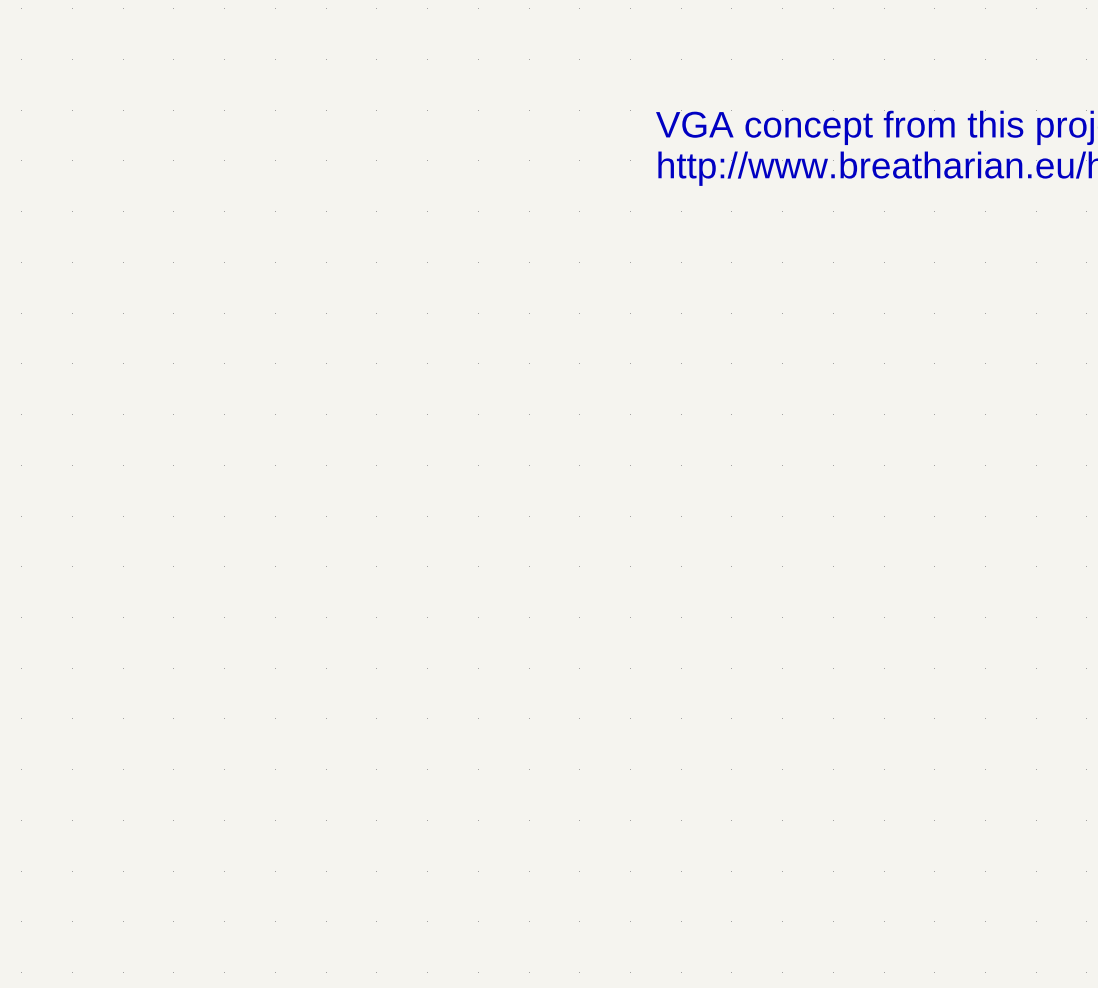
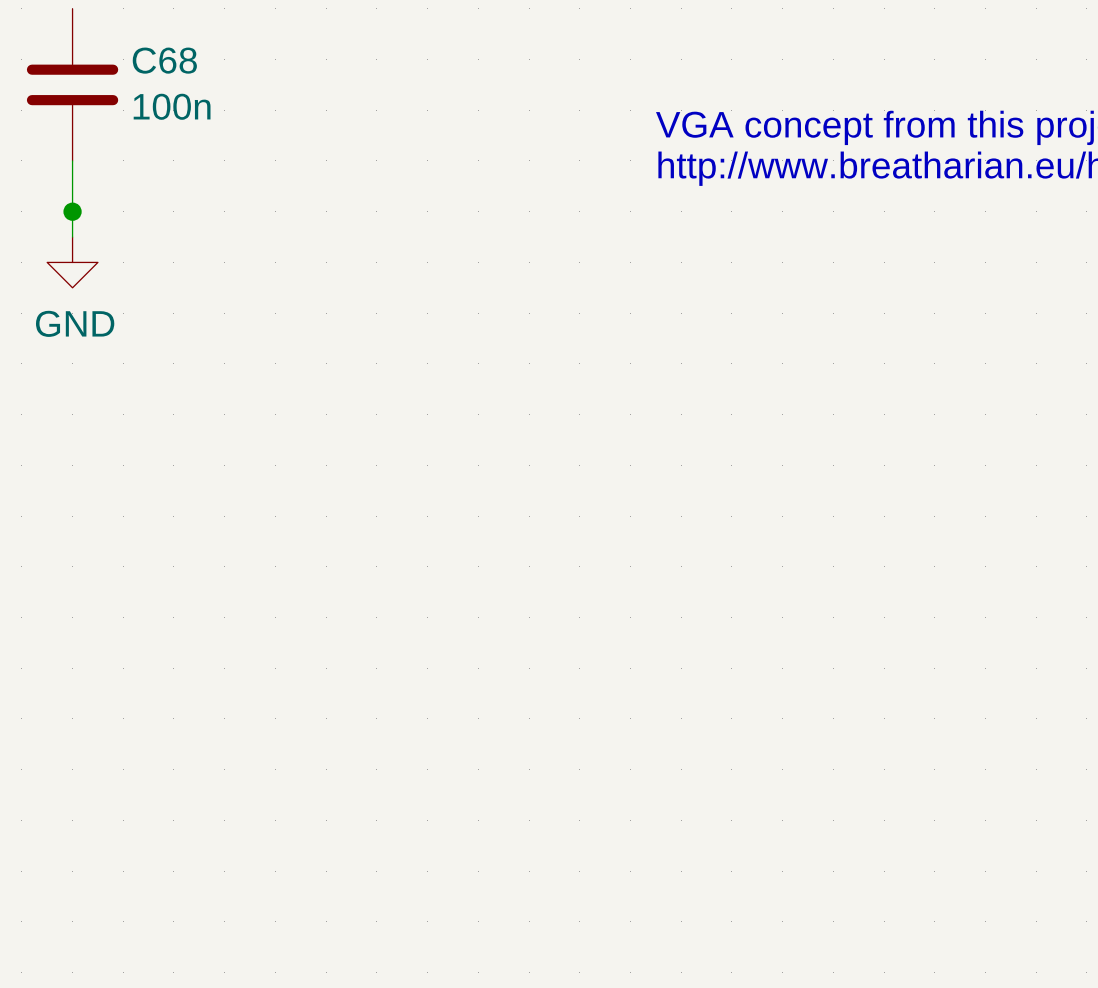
C68: none -> 100n (72, 84)
wire: none -> (72, 160) (72, 237)
junction: none -> (72, 211)
power symbol: none -> GND (72, 262)

